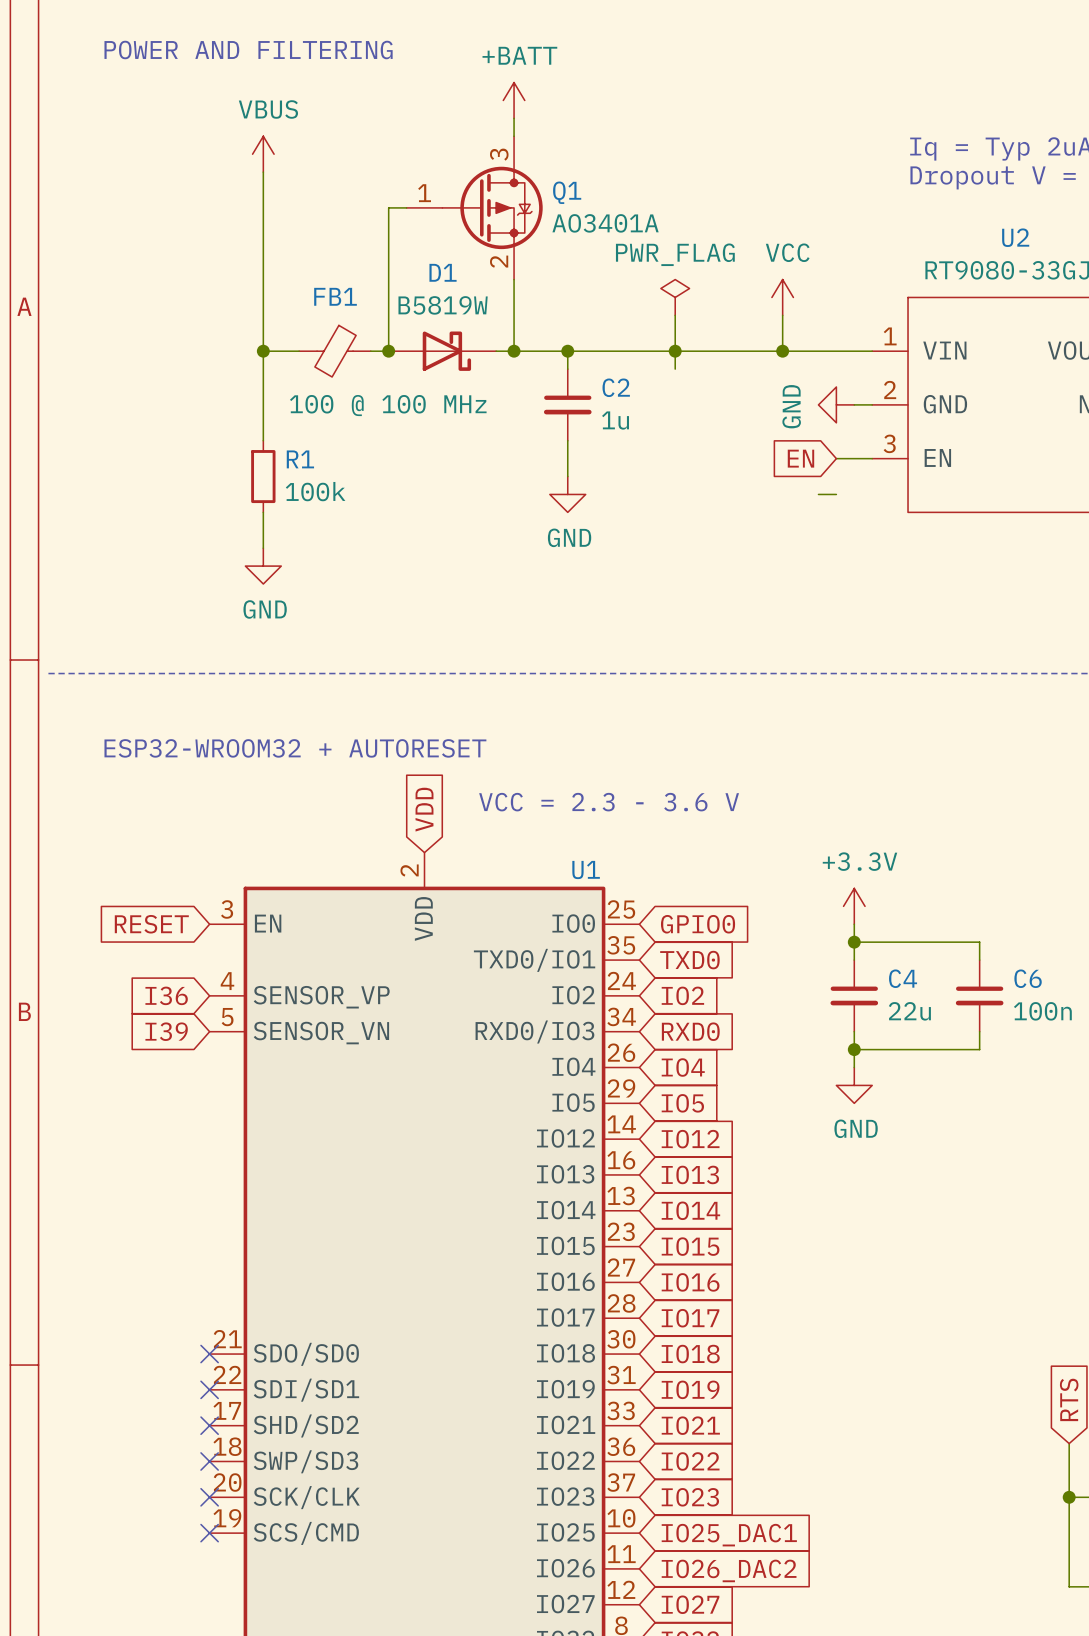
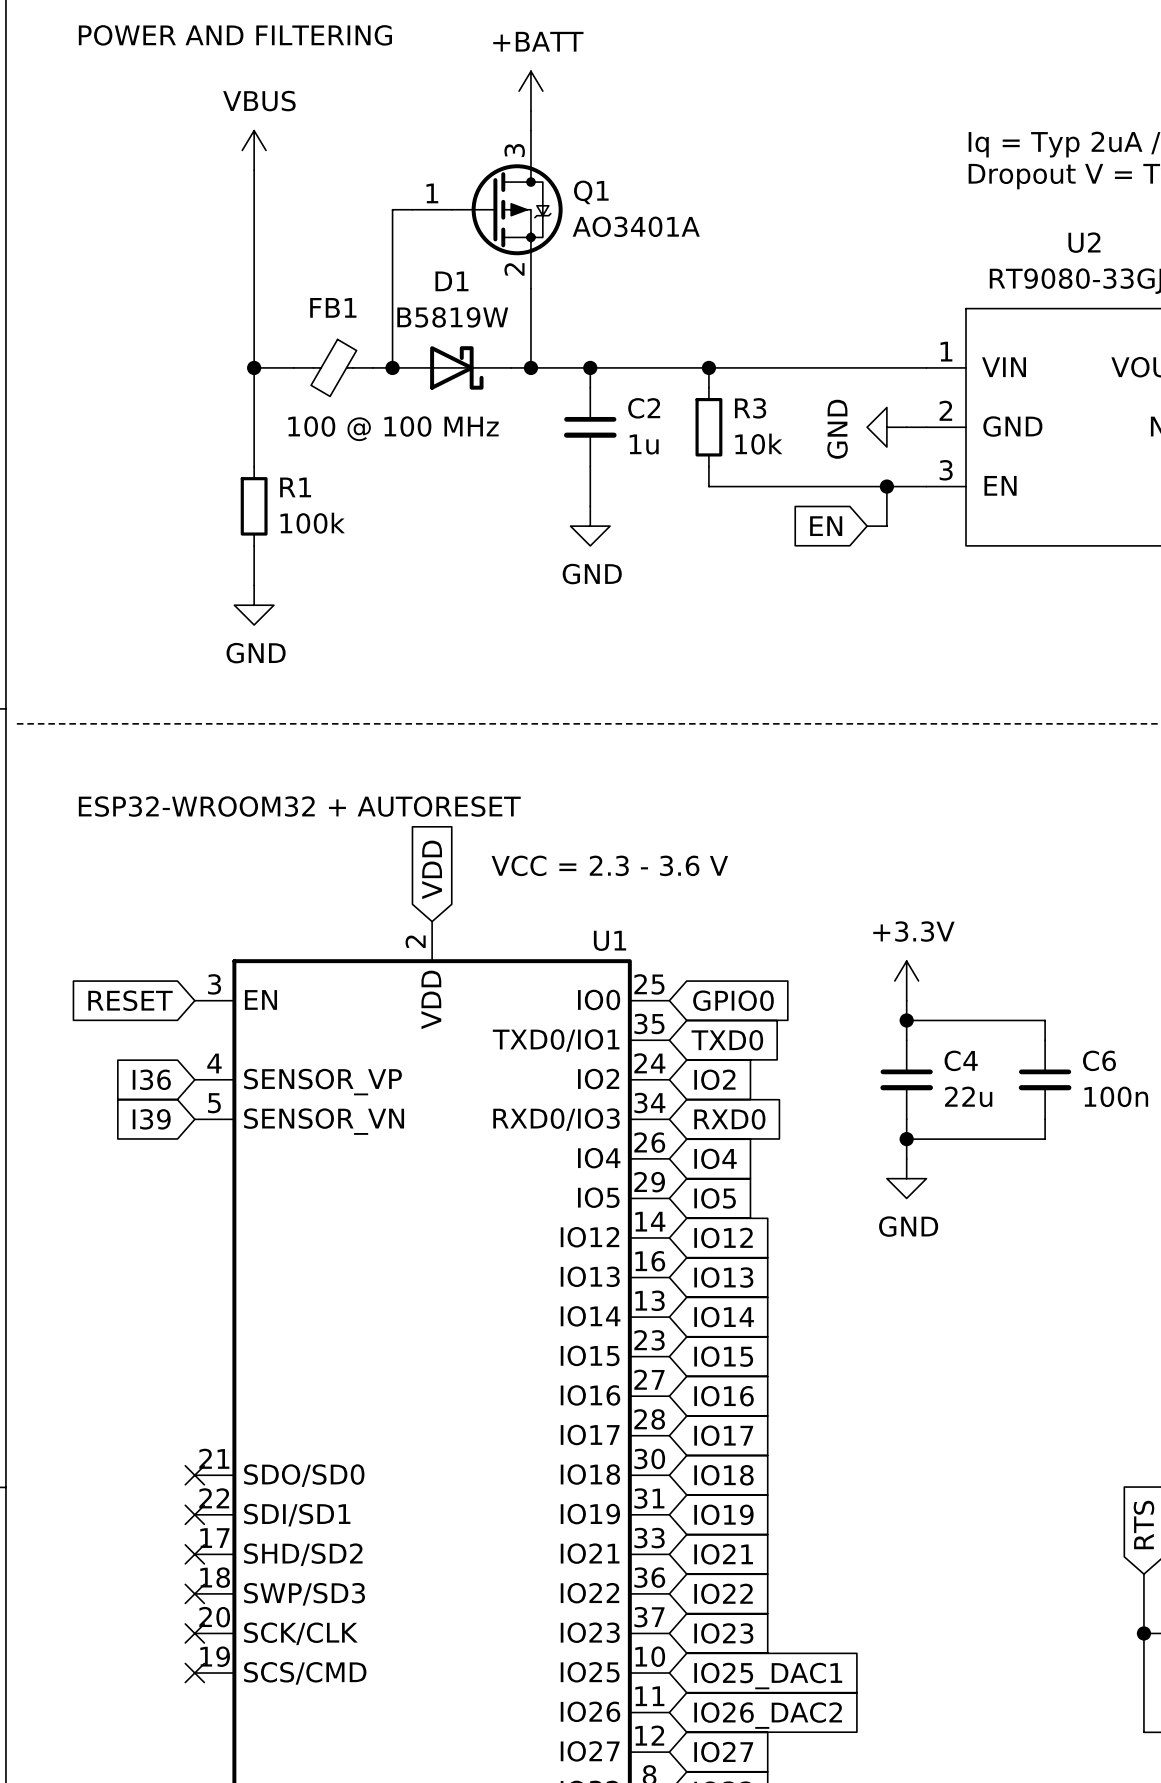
power symbol: PWR_FLAG (675, 297) -> none
power symbol: VCC (782, 297) -> none
wire: (675, 315) (675, 351) -> none
wire: (782, 315) (782, 351) -> none
junction: (782, 351) -> none
R3: none -> 10k (708, 427)
wire: none -> (708, 466) (708, 486) (886, 486) (886, 526)
global label position: EN (800, 458) -> EN (826, 526)
junction: none -> (886, 486)

